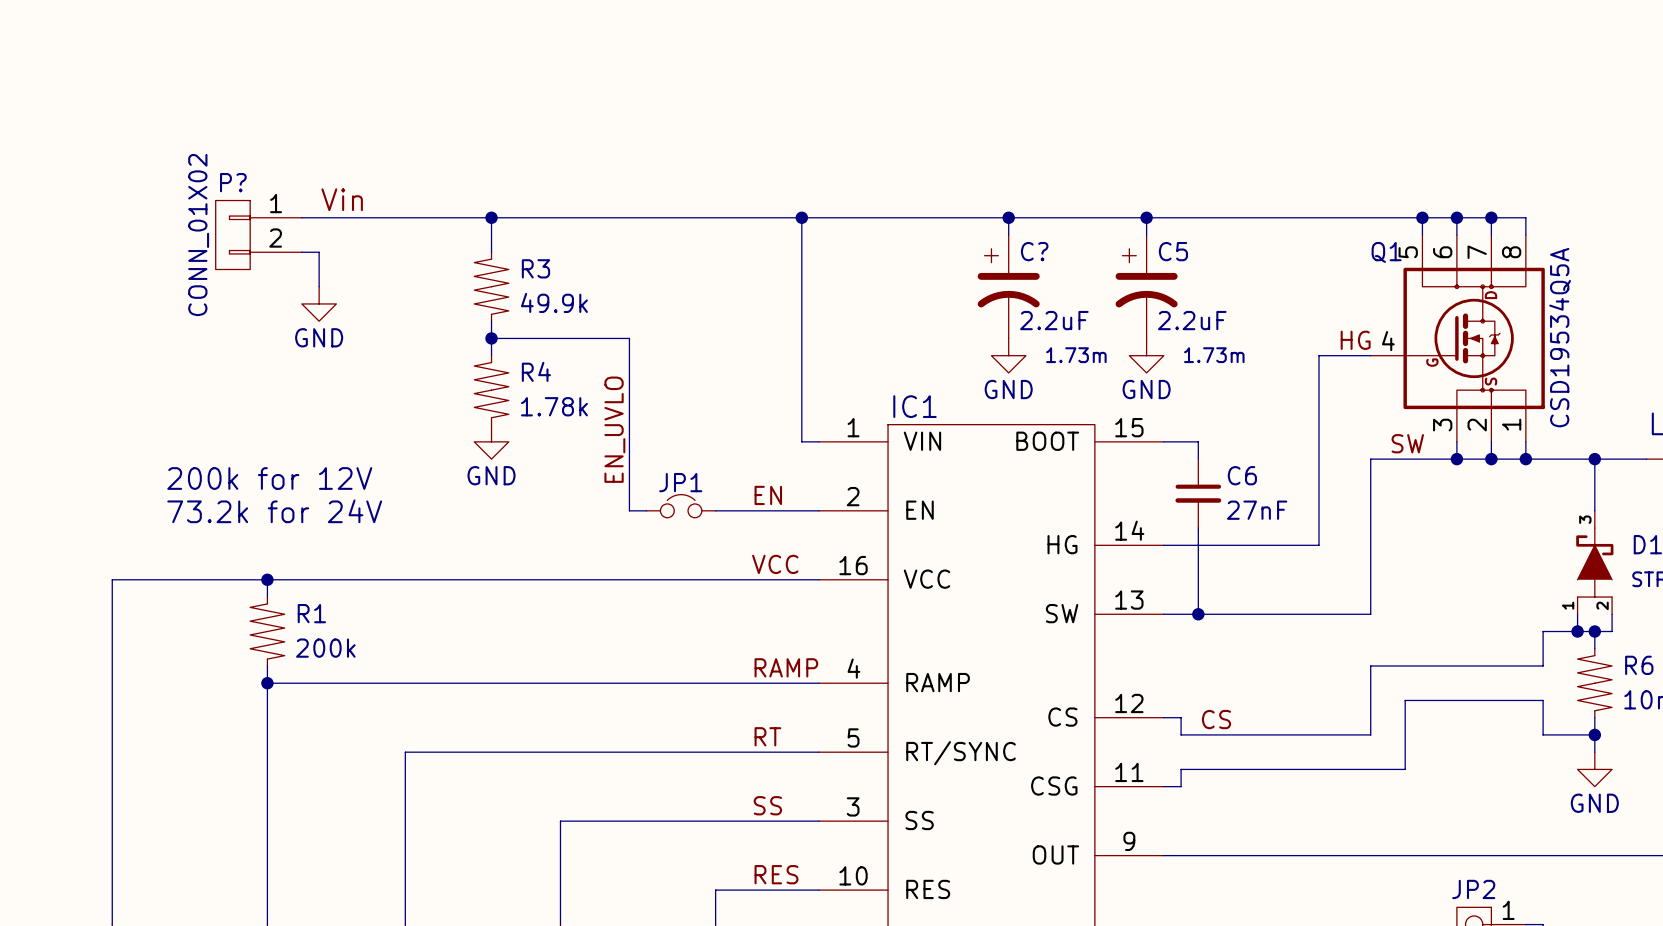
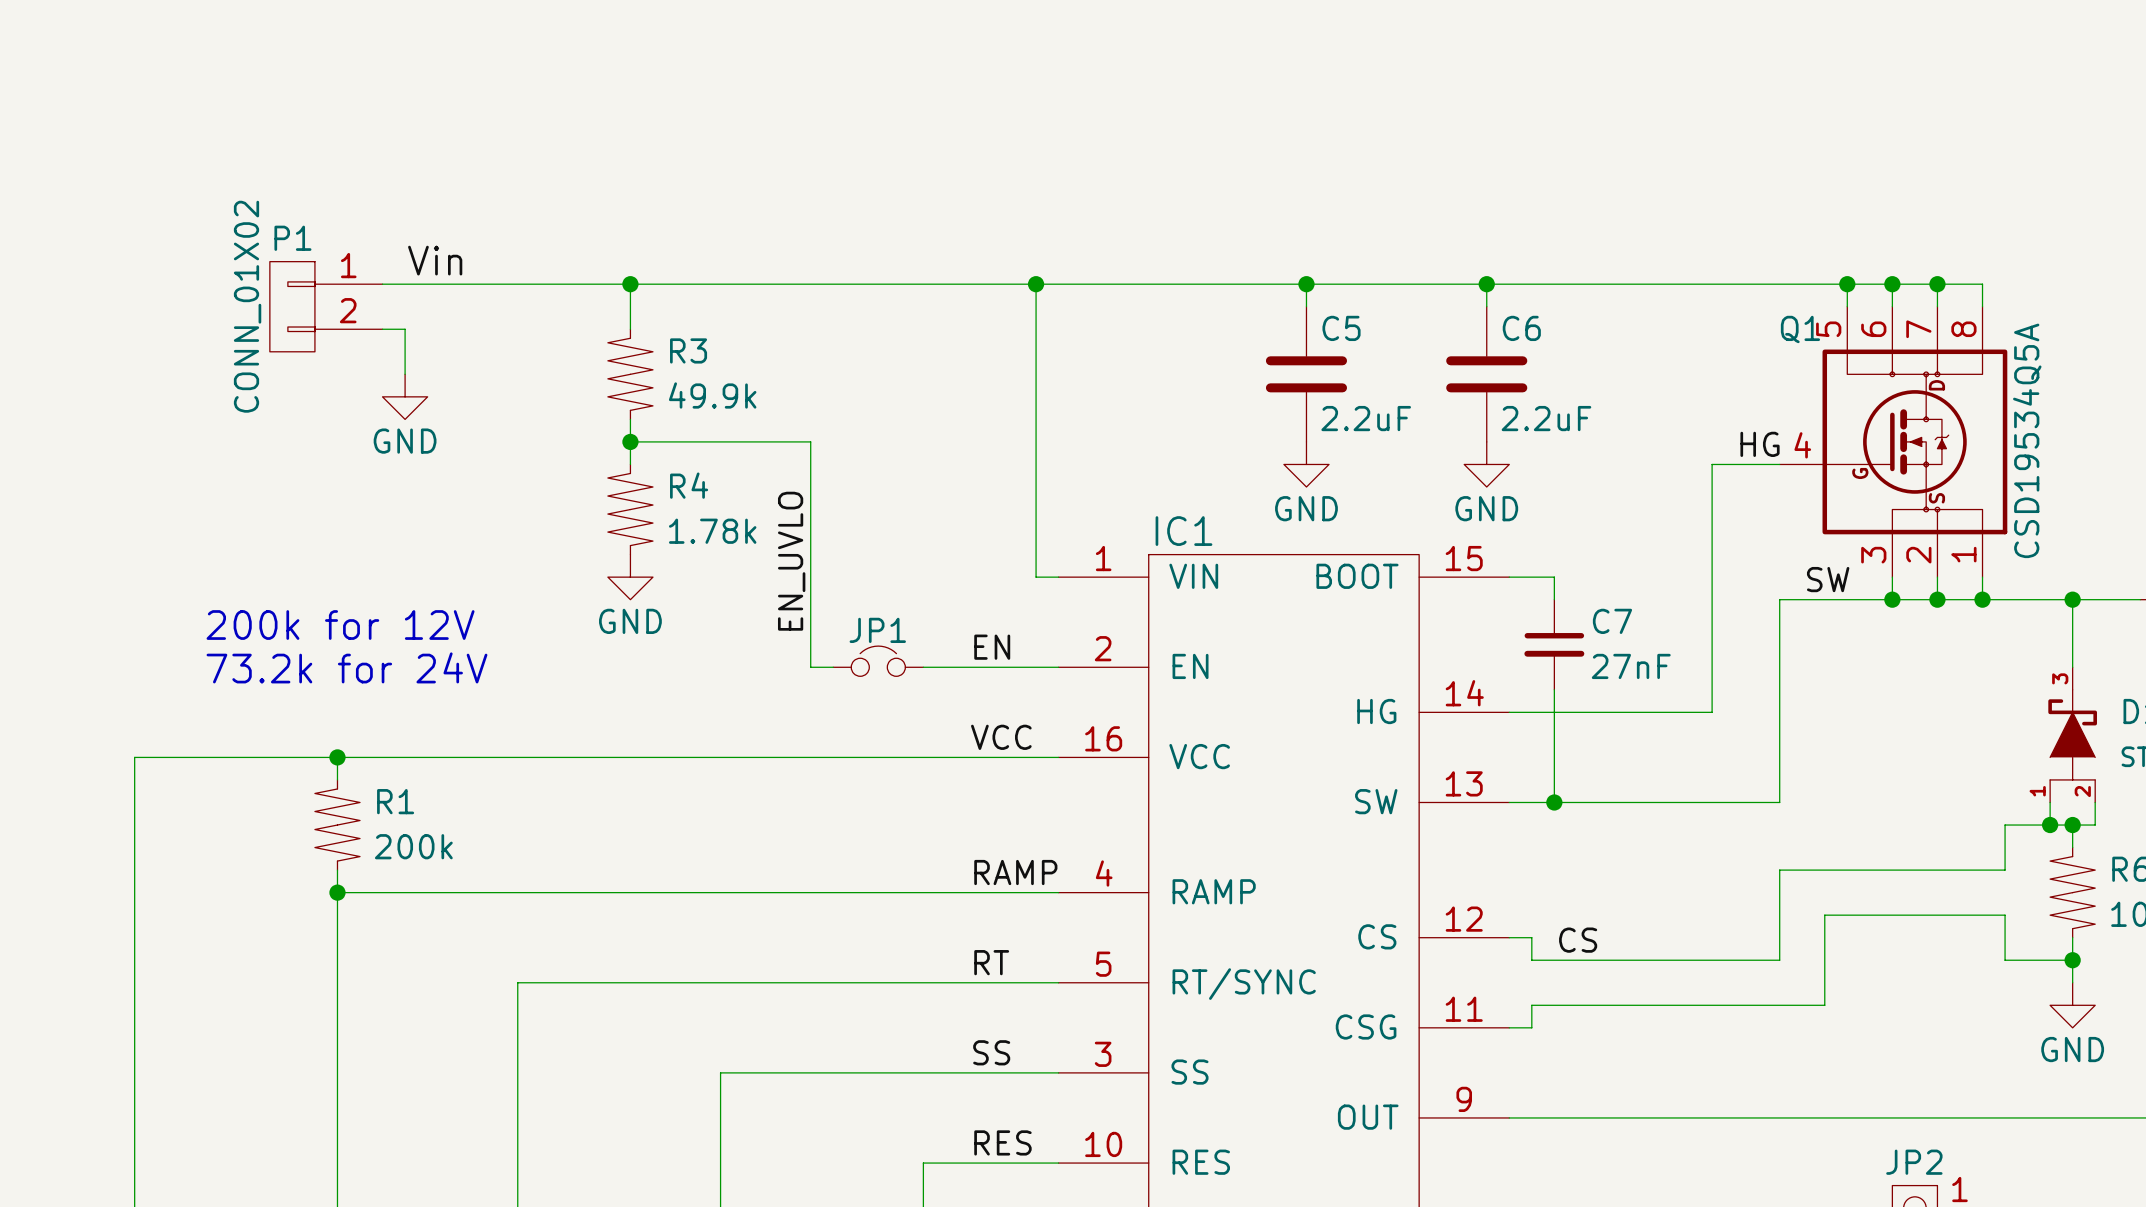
P? name: P? (233, 182) -> P1 (292, 238)
C5 symbol: [1115, 235, 1178, 339] -> [1265, 306, 1348, 442]
C?: 2.2uF (1008, 286) -> none
C6: none -> 2.2uF (1486, 374)
C5 text: 1.73m (1214, 355) -> none
C6 name: C6 (1242, 475) -> C7 (1612, 621)

